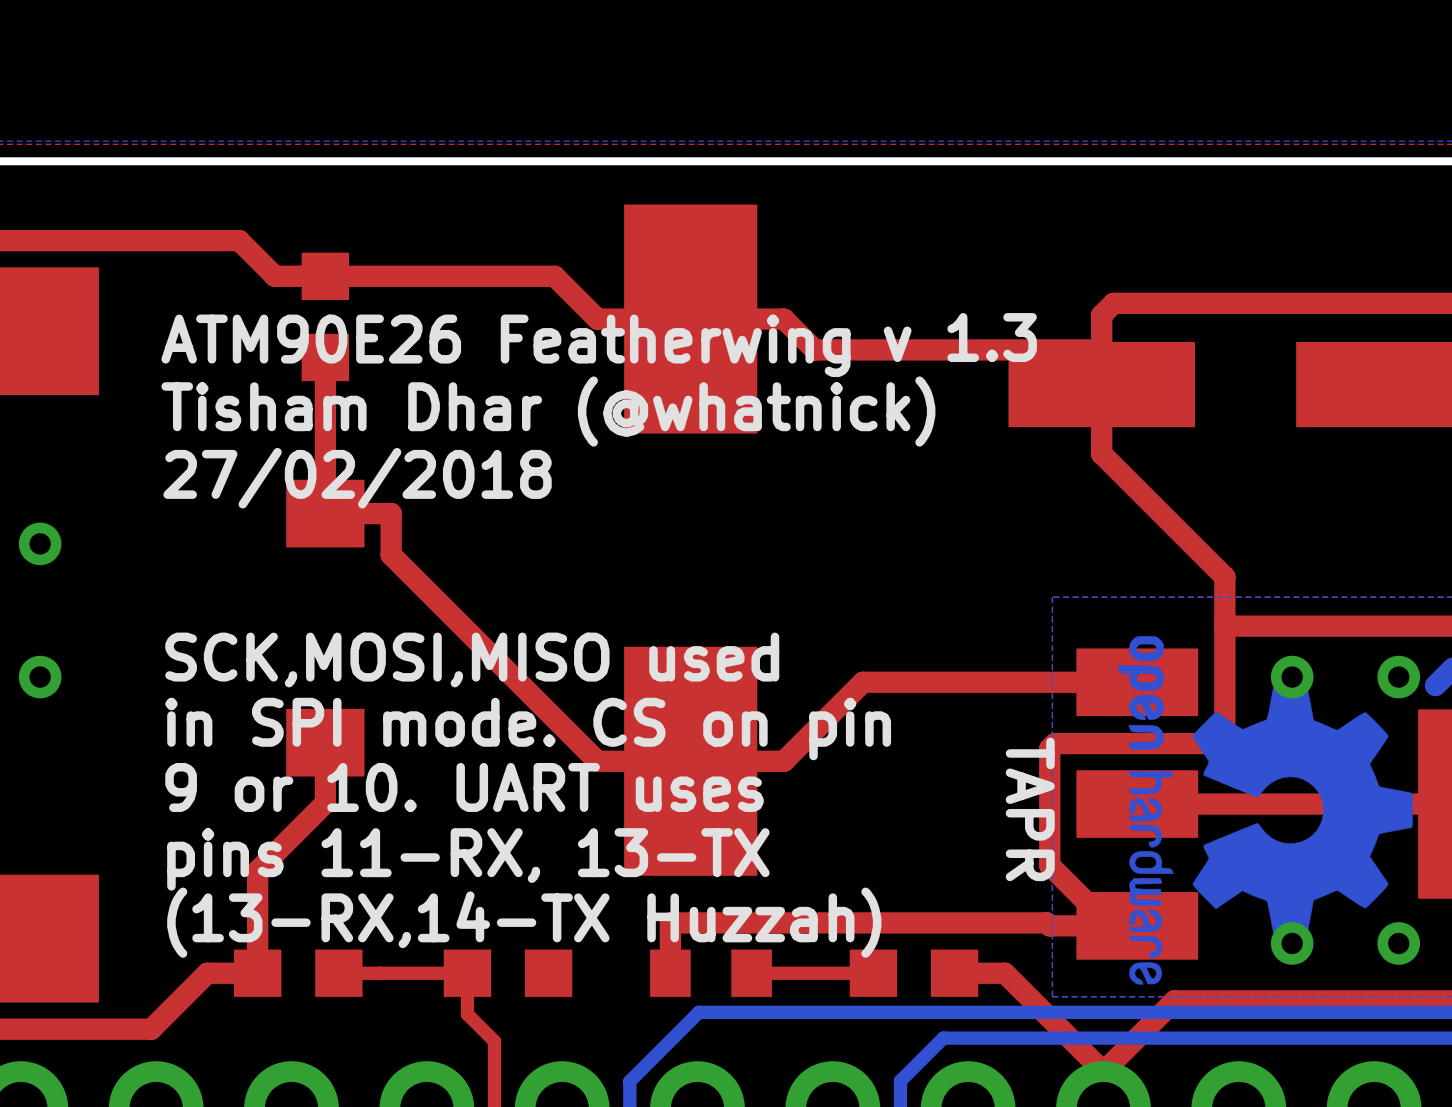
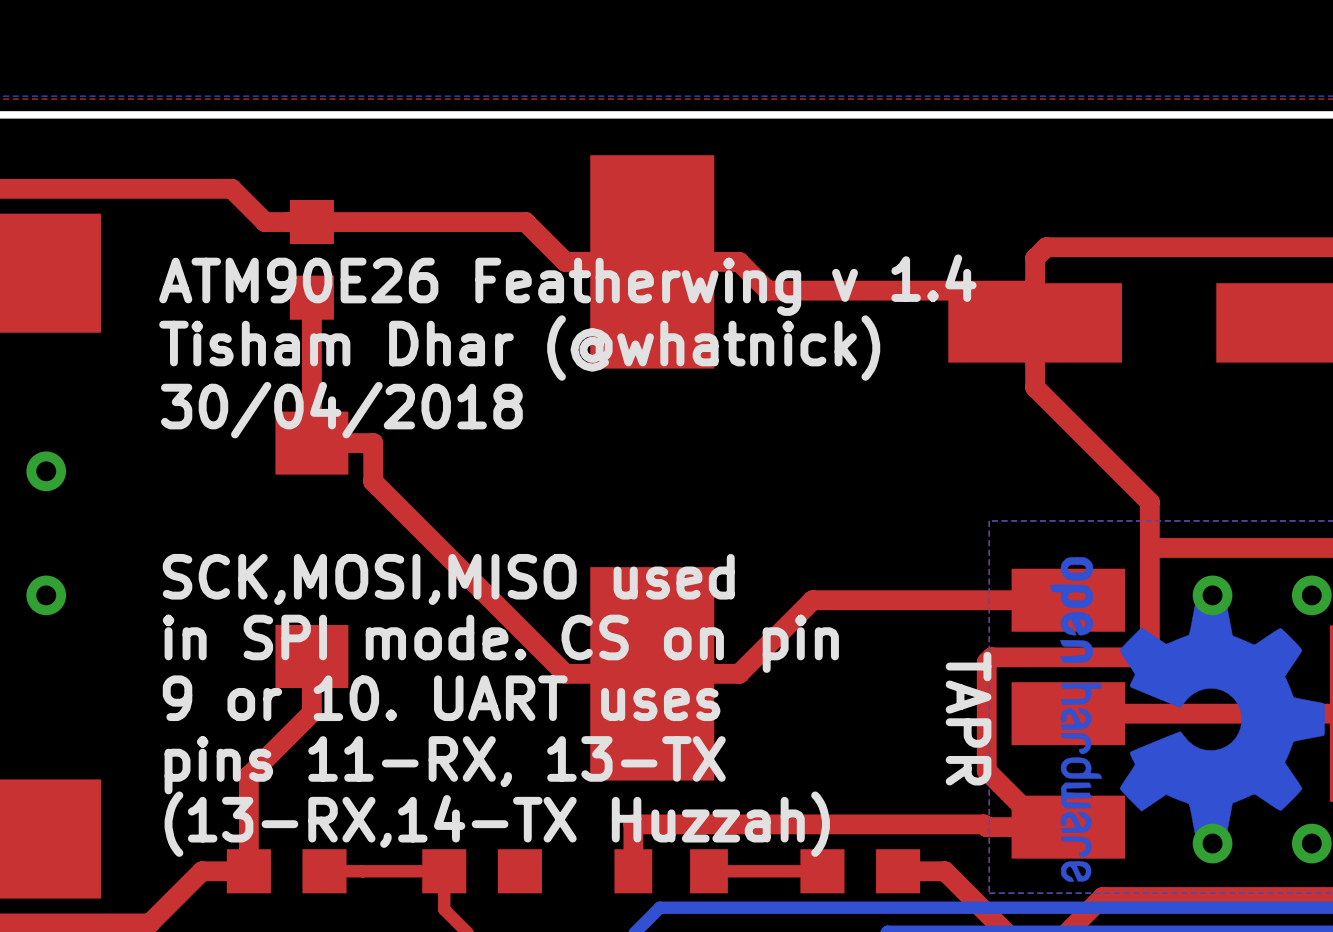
text: v 1.3 (960, 337) -> v 1.4 (904, 278)
text: 27/02/2018 (357, 478) -> 30/04/2018 (341, 410)

